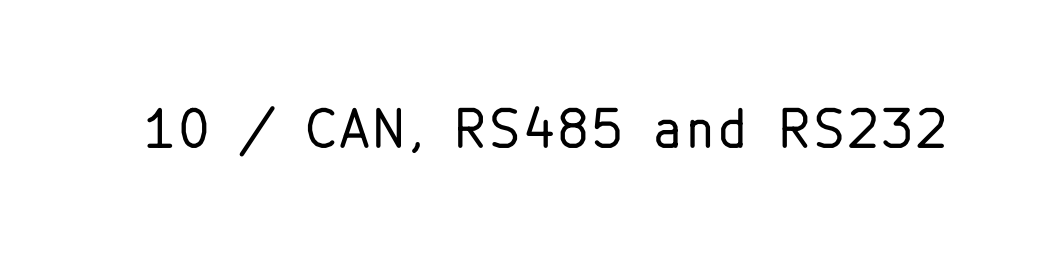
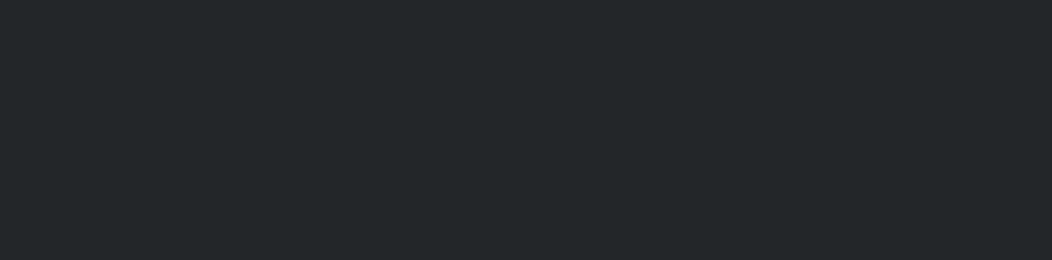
text: 10 / CAN, RS485 and RS232 (545, 131) -> none

